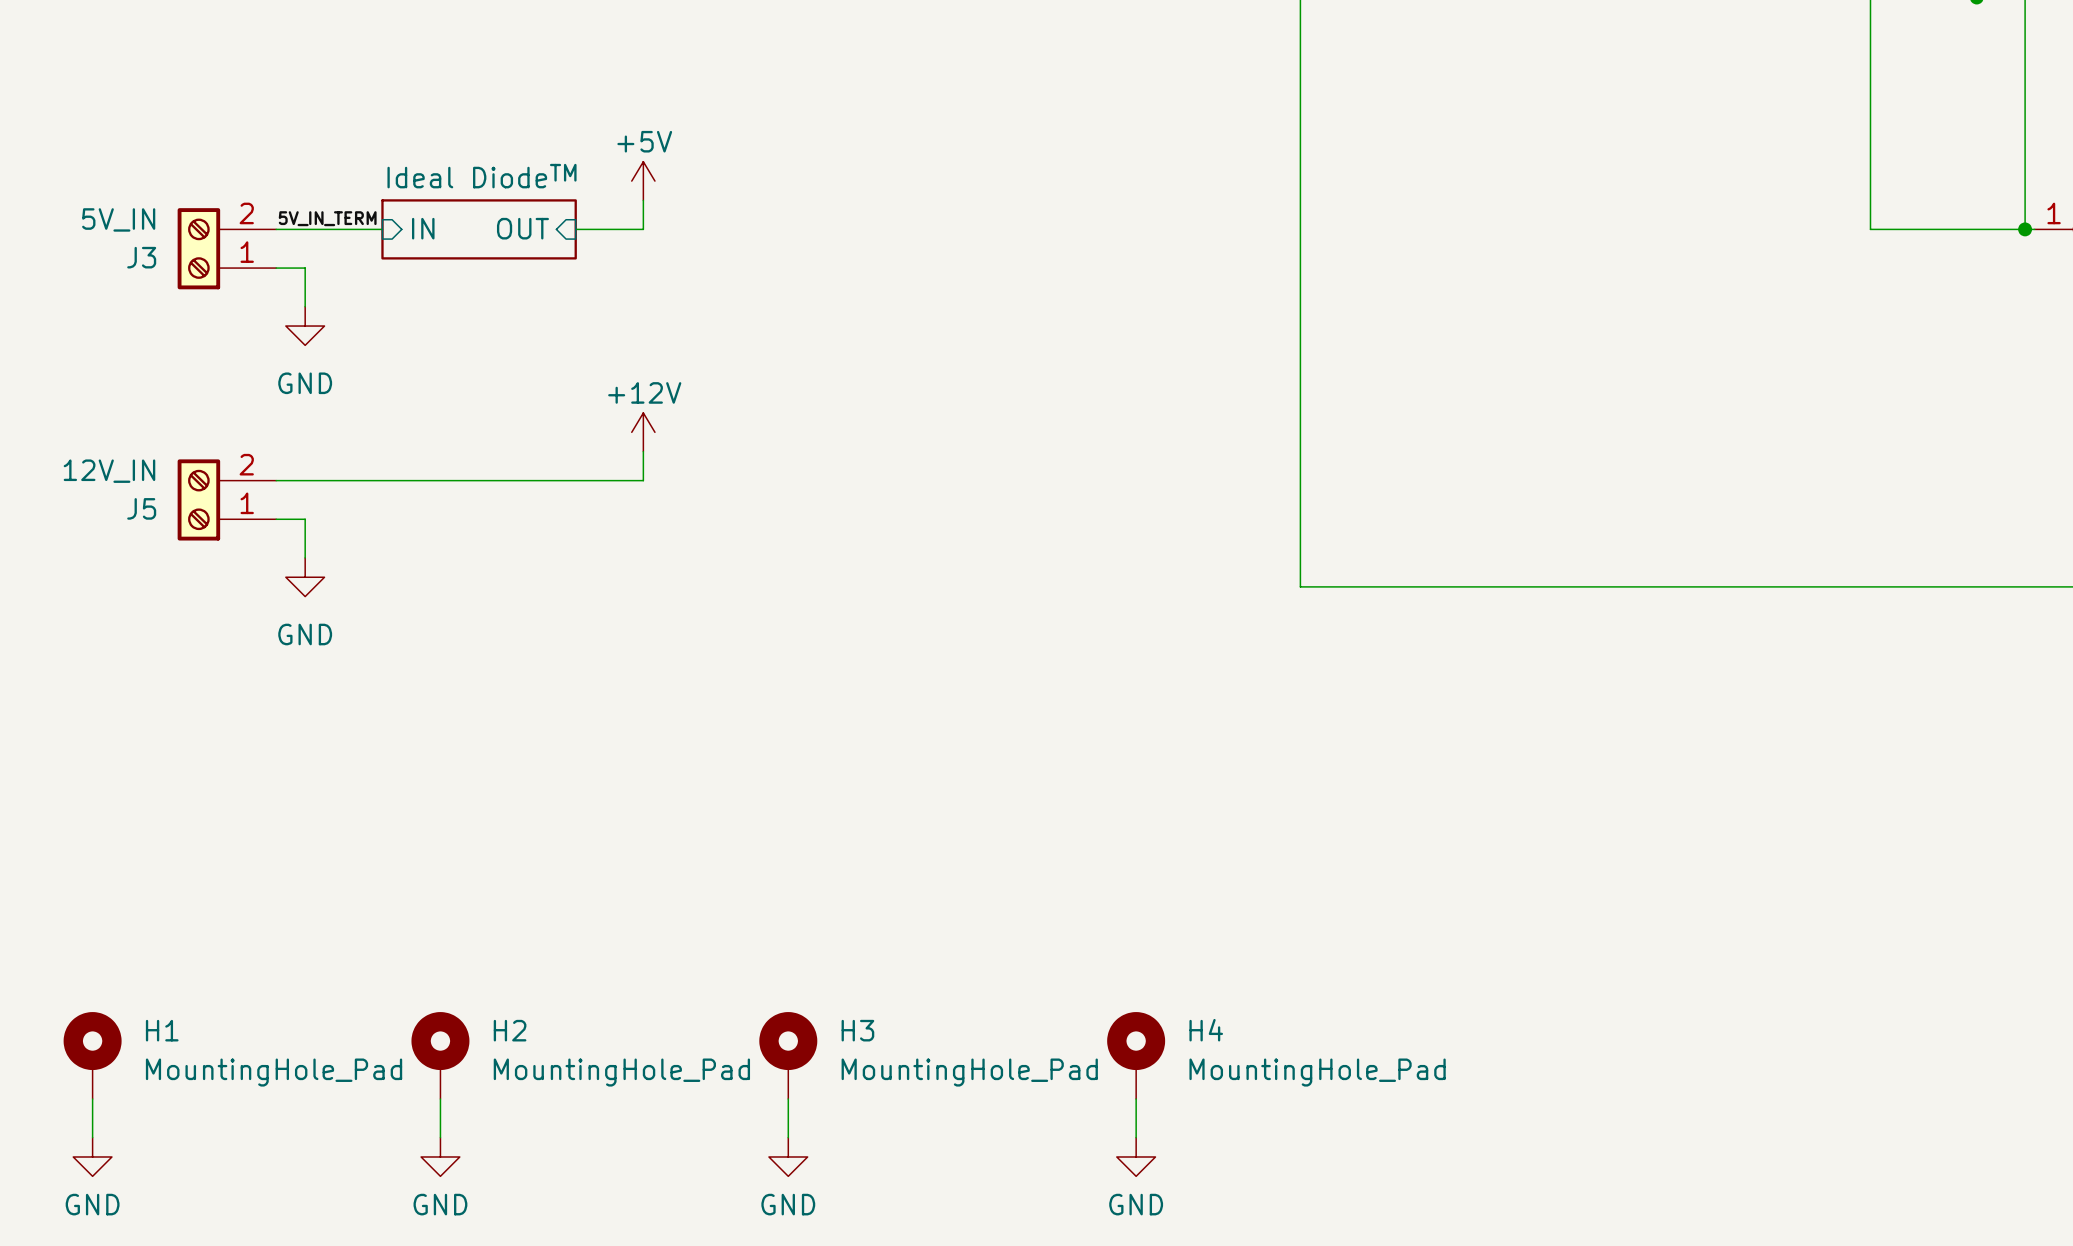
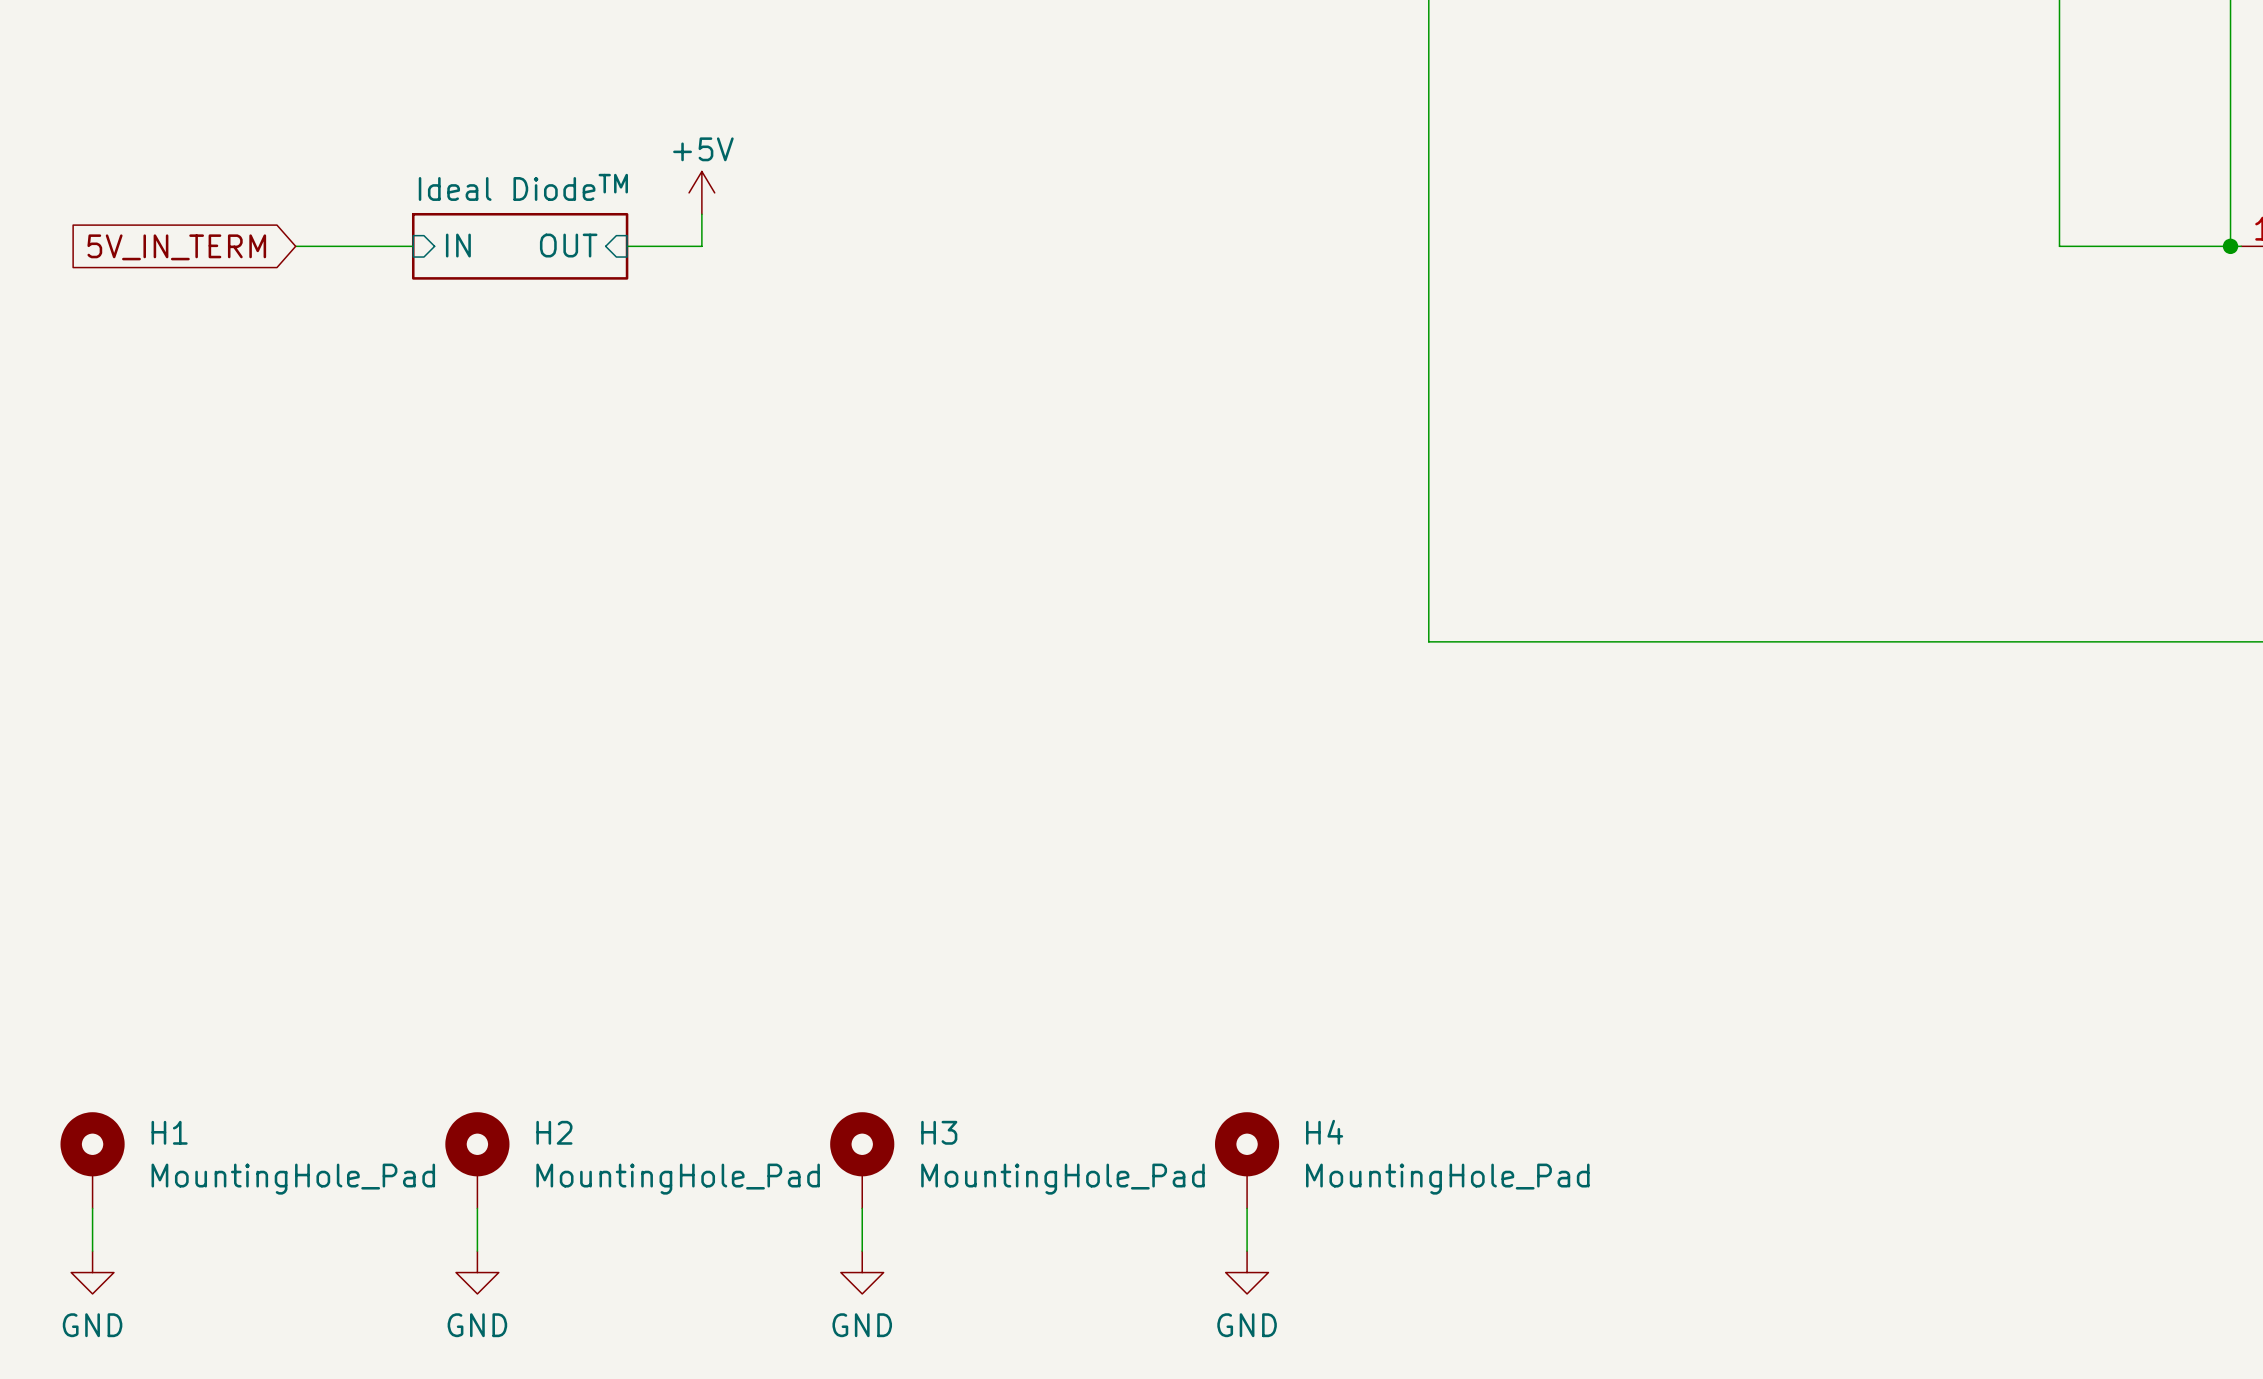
label: 5V_IN_TERM (327, 218) -> none
global label: none -> 5V_IN_TERM (176, 247)
J3: 5V_IN (226, 248) -> none
wire: (276, 268) (305, 268) (305, 306) -> none
power symbol: GND (305, 326) -> none
power symbol: +12V (643, 432) -> none
wire: (643, 451) (643, 480) (276, 480) -> none
J5: 12V_IN (226, 499) -> none
wire: (276, 519) (305, 519) (305, 557) -> none
power symbol: GND (305, 577) -> none

